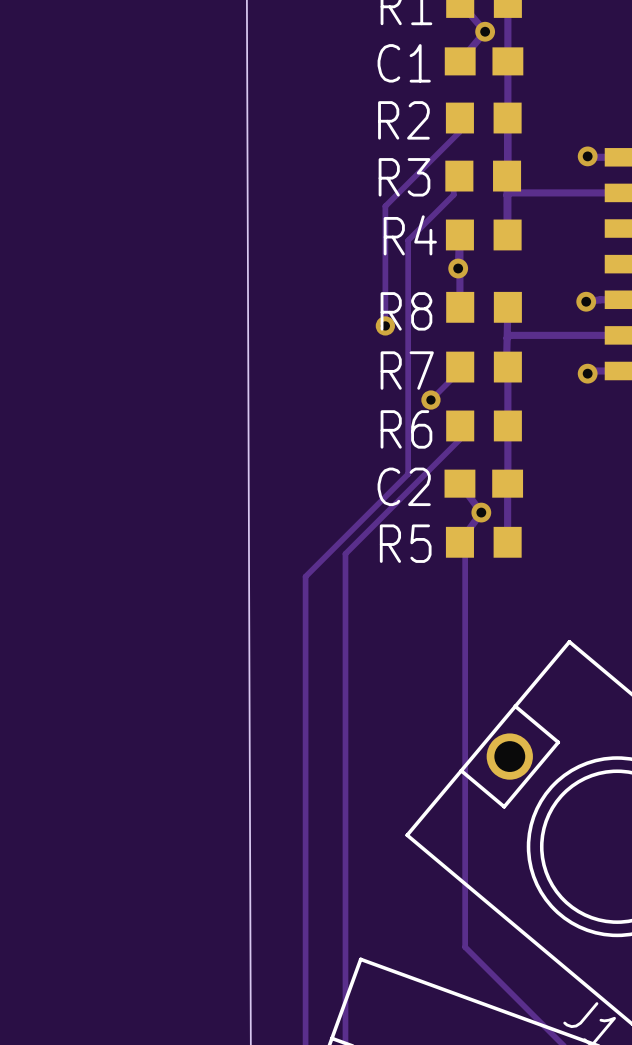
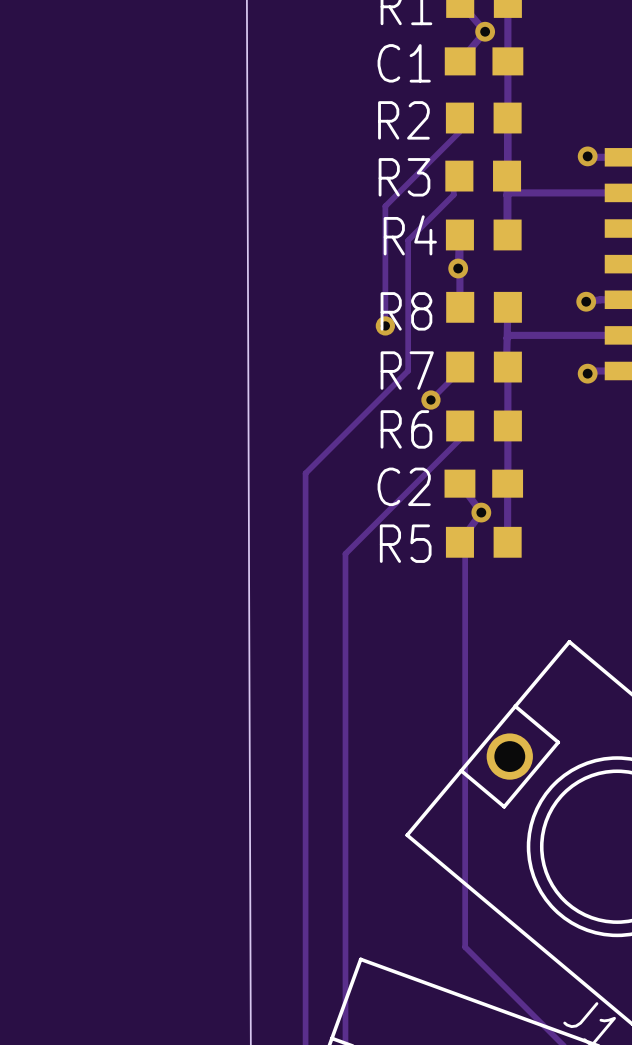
track: (408, 370) (408, 474) (305, 576) -> (408, 370) (305, 473) (305, 576)

